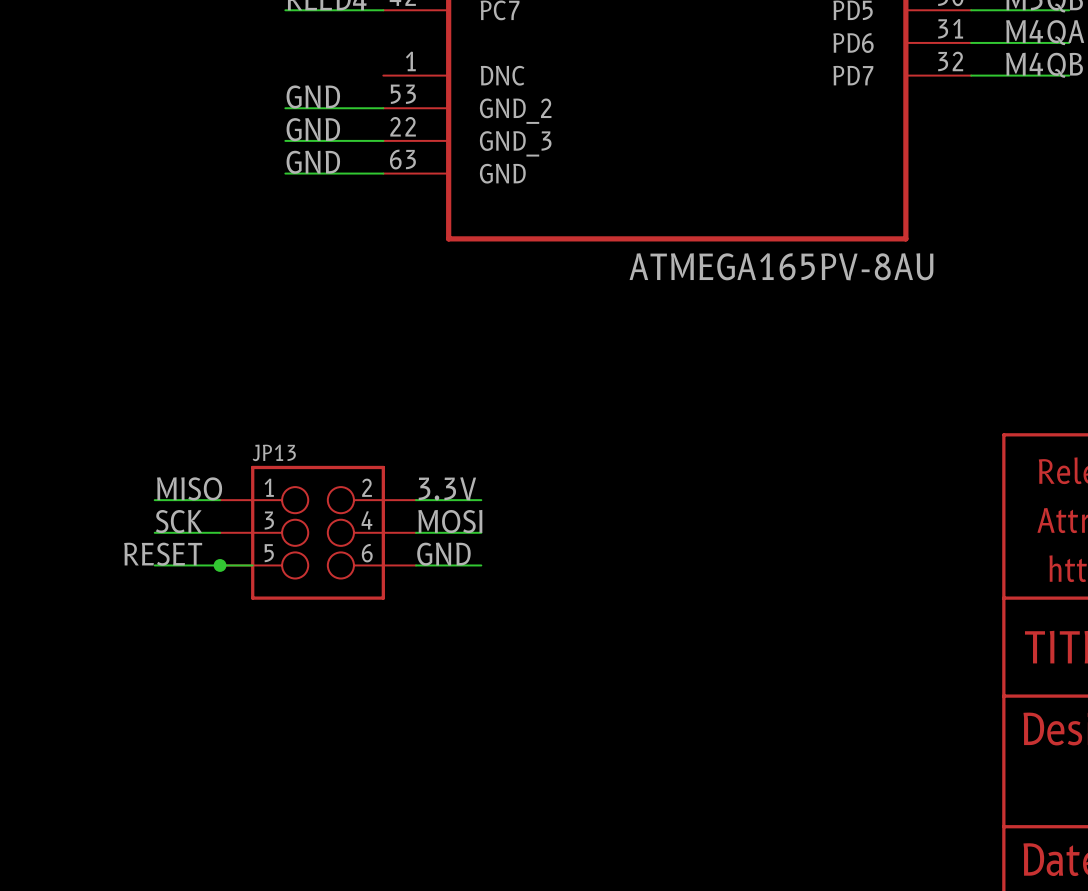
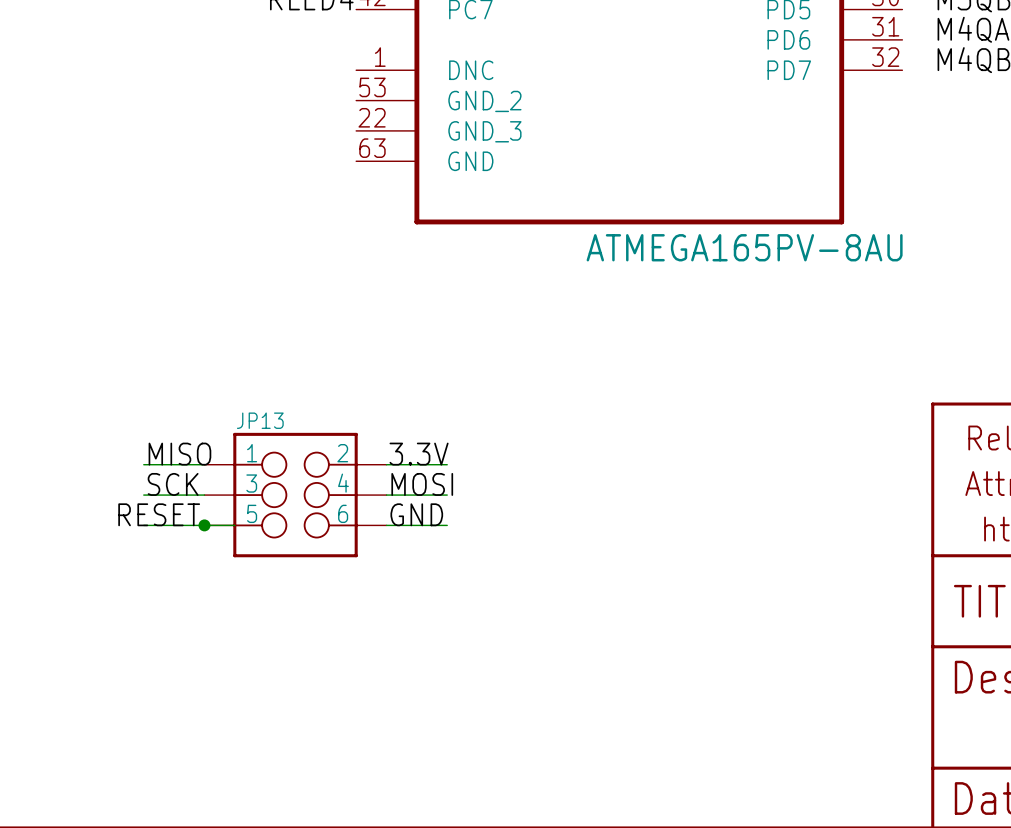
wire: (285, 10) (383, 10) -> none
wire: (971, 10) (1069, 10) -> none
wire: (971, 42) (1069, 42) -> none
wire: (971, 75) (1069, 75) -> none
label: GND (313, 96) -> none
wire: (285, 108) (383, 108) -> none
label: GND (313, 129) -> none
wire: (285, 140) (383, 140) -> none
label: GND (313, 162) -> none
wire: (285, 173) (383, 173) -> none

